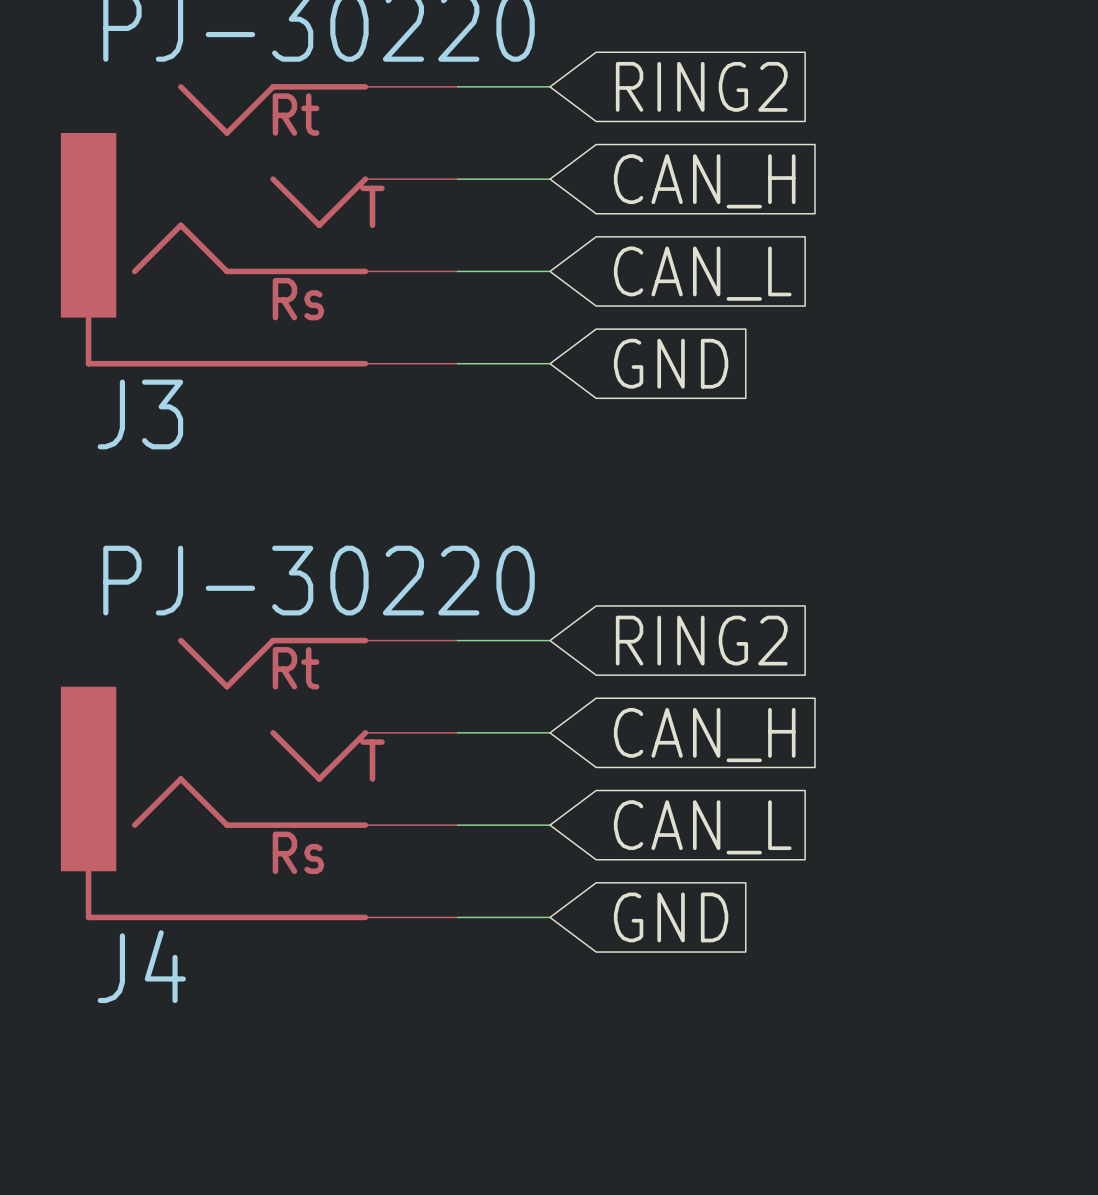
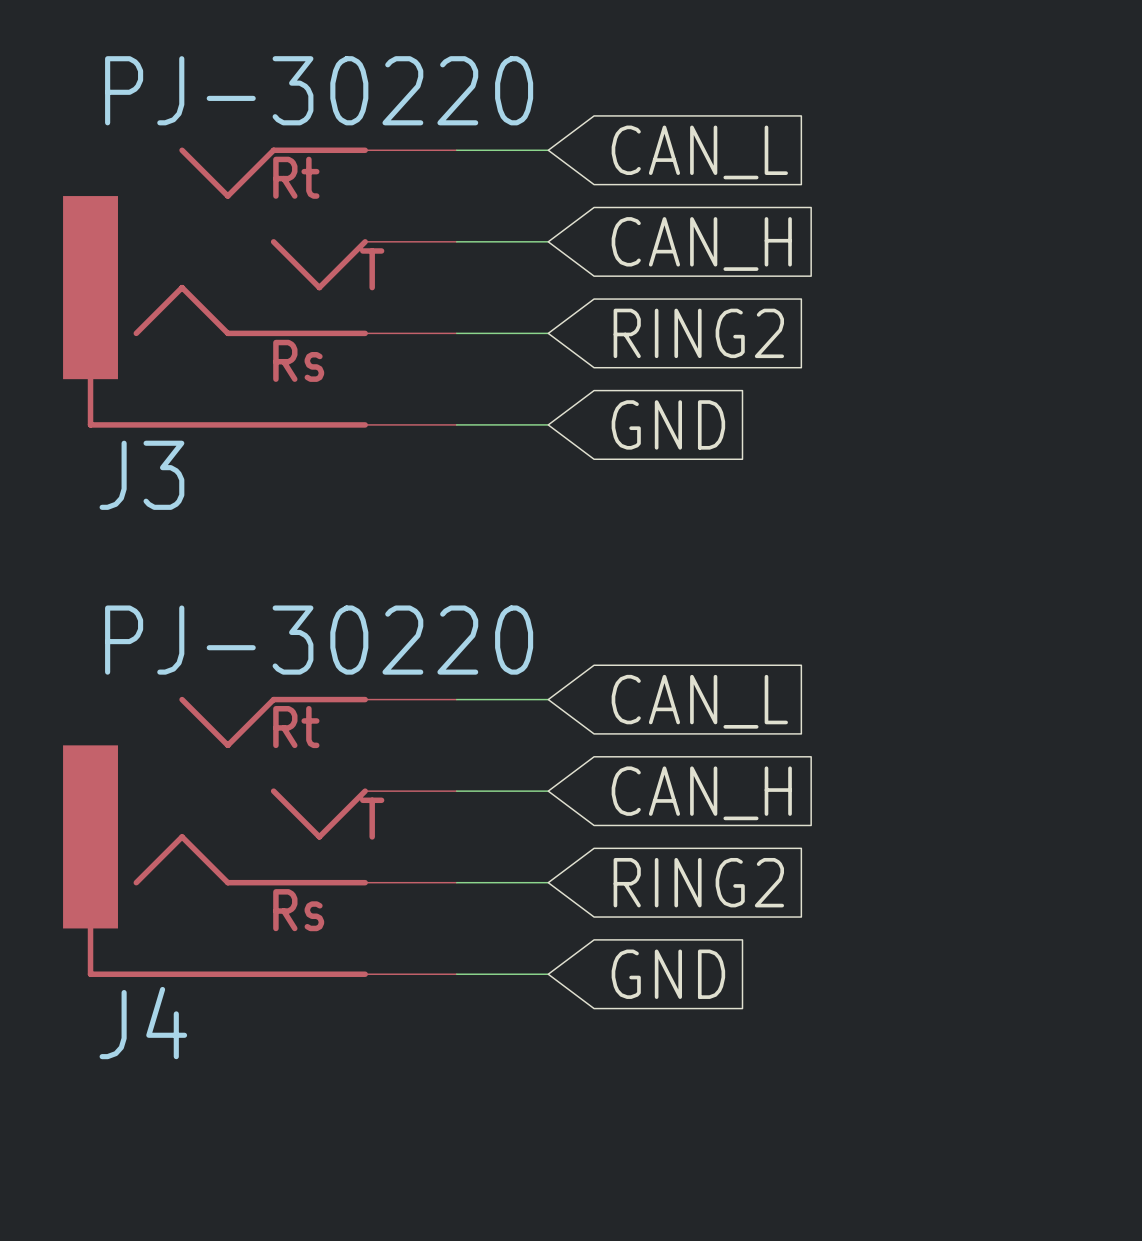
global label: RING2 (701, 86) -> CAN_L (699, 152)
global label: CAN_L (702, 273) -> RING2 (698, 333)
global label: RING2 (701, 640) -> CAN_L (699, 701)
global label: CAN_L (702, 827) -> RING2 (698, 882)

